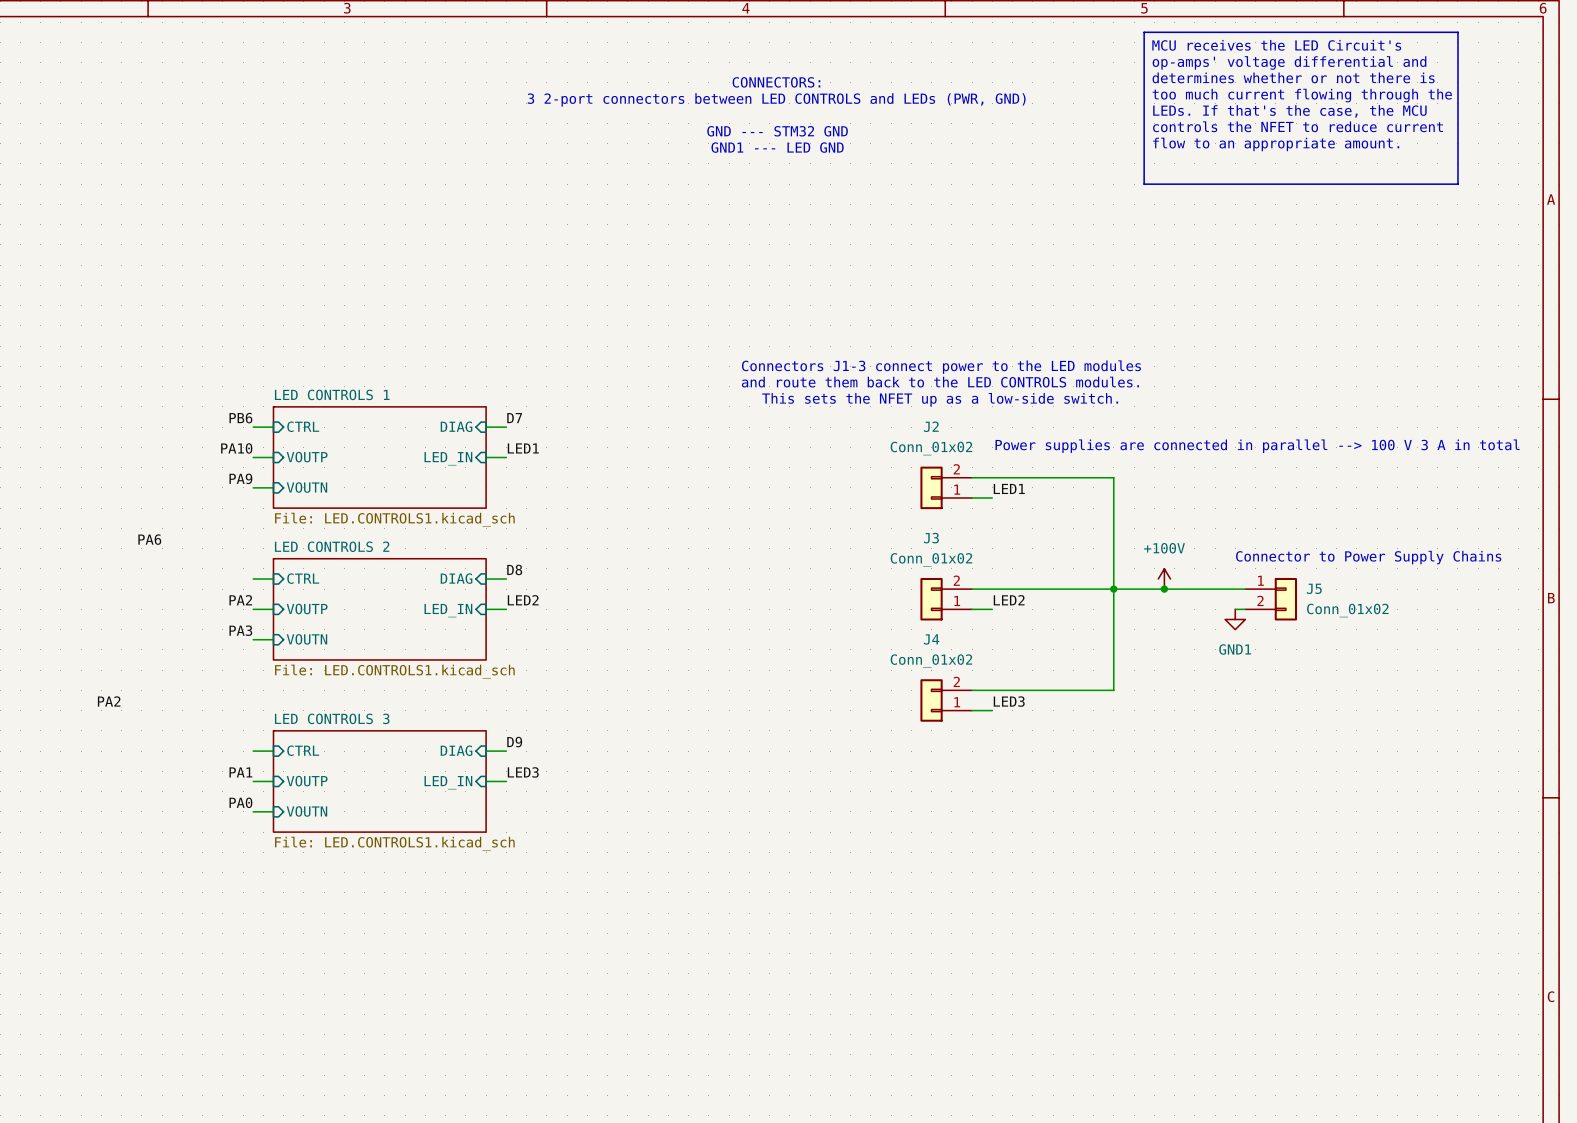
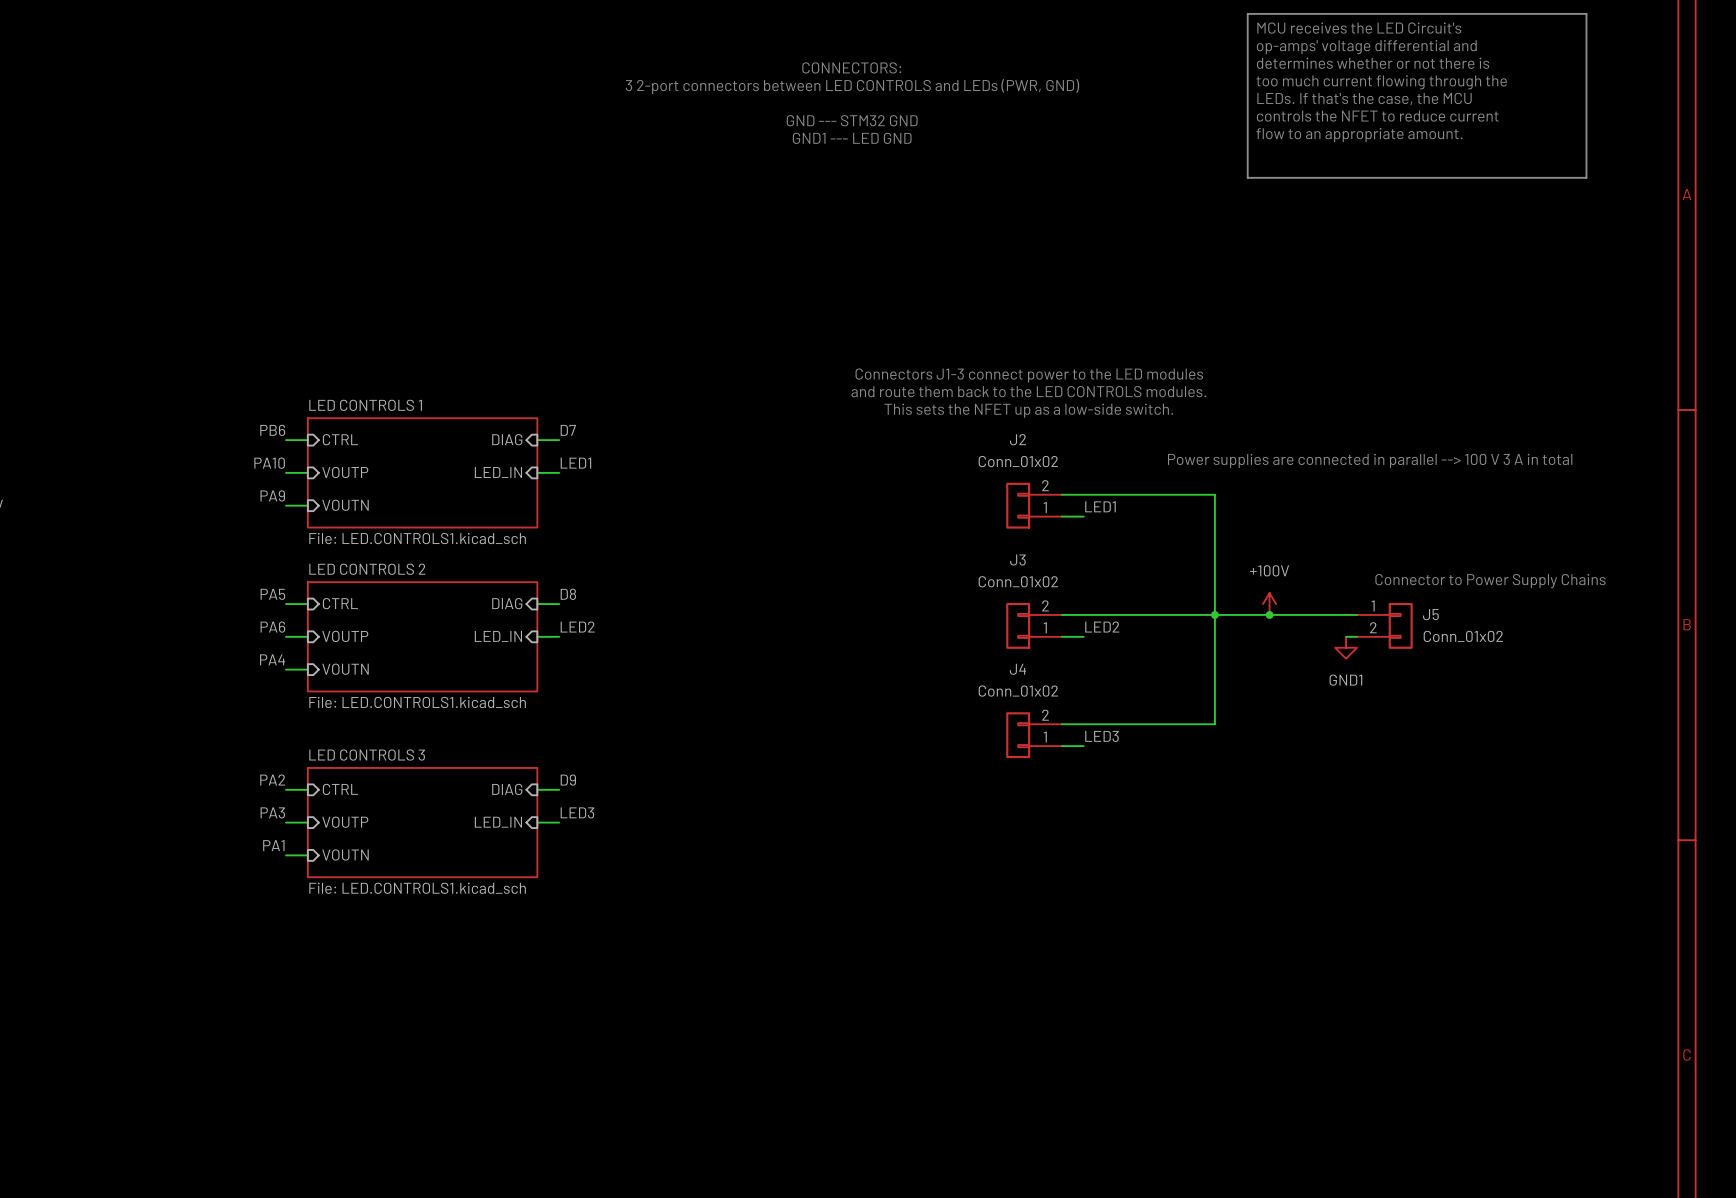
label: PA6 (149, 539) -> none
label: none -> PA5 (272, 594)
label: PA2 (240, 600) -> PA6 (272, 627)
label: PA3 (240, 630) -> PA4 (272, 659)
label position: PA2 (109, 701) -> PA2 (272, 780)
label: PA1 (240, 772) -> PA3 (272, 812)
label: PA0 (240, 802) -> PA1 (273, 845)

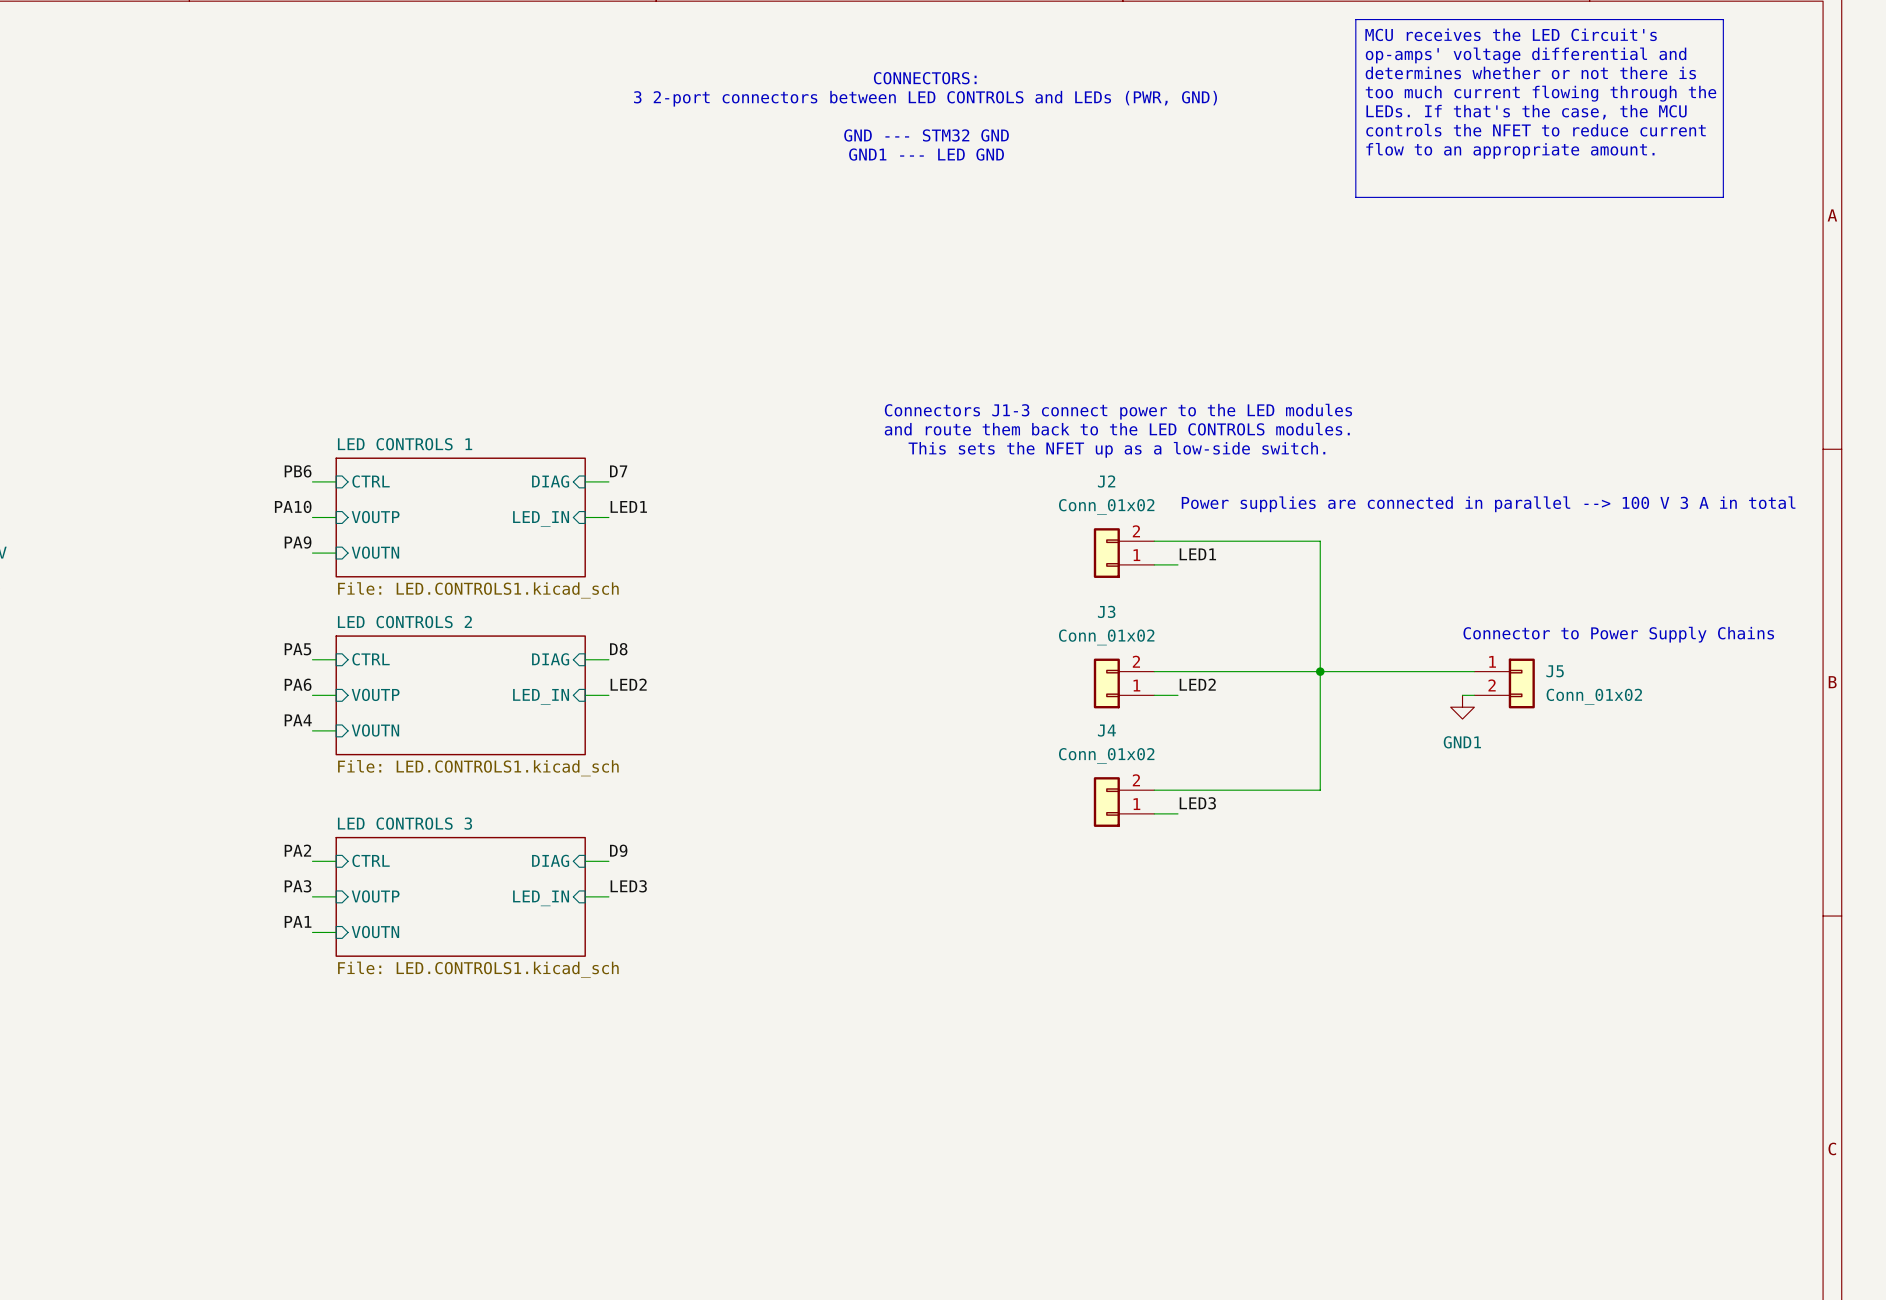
power symbol: +100V (1269, 604) -> none
junction: (1269, 614) -> none

